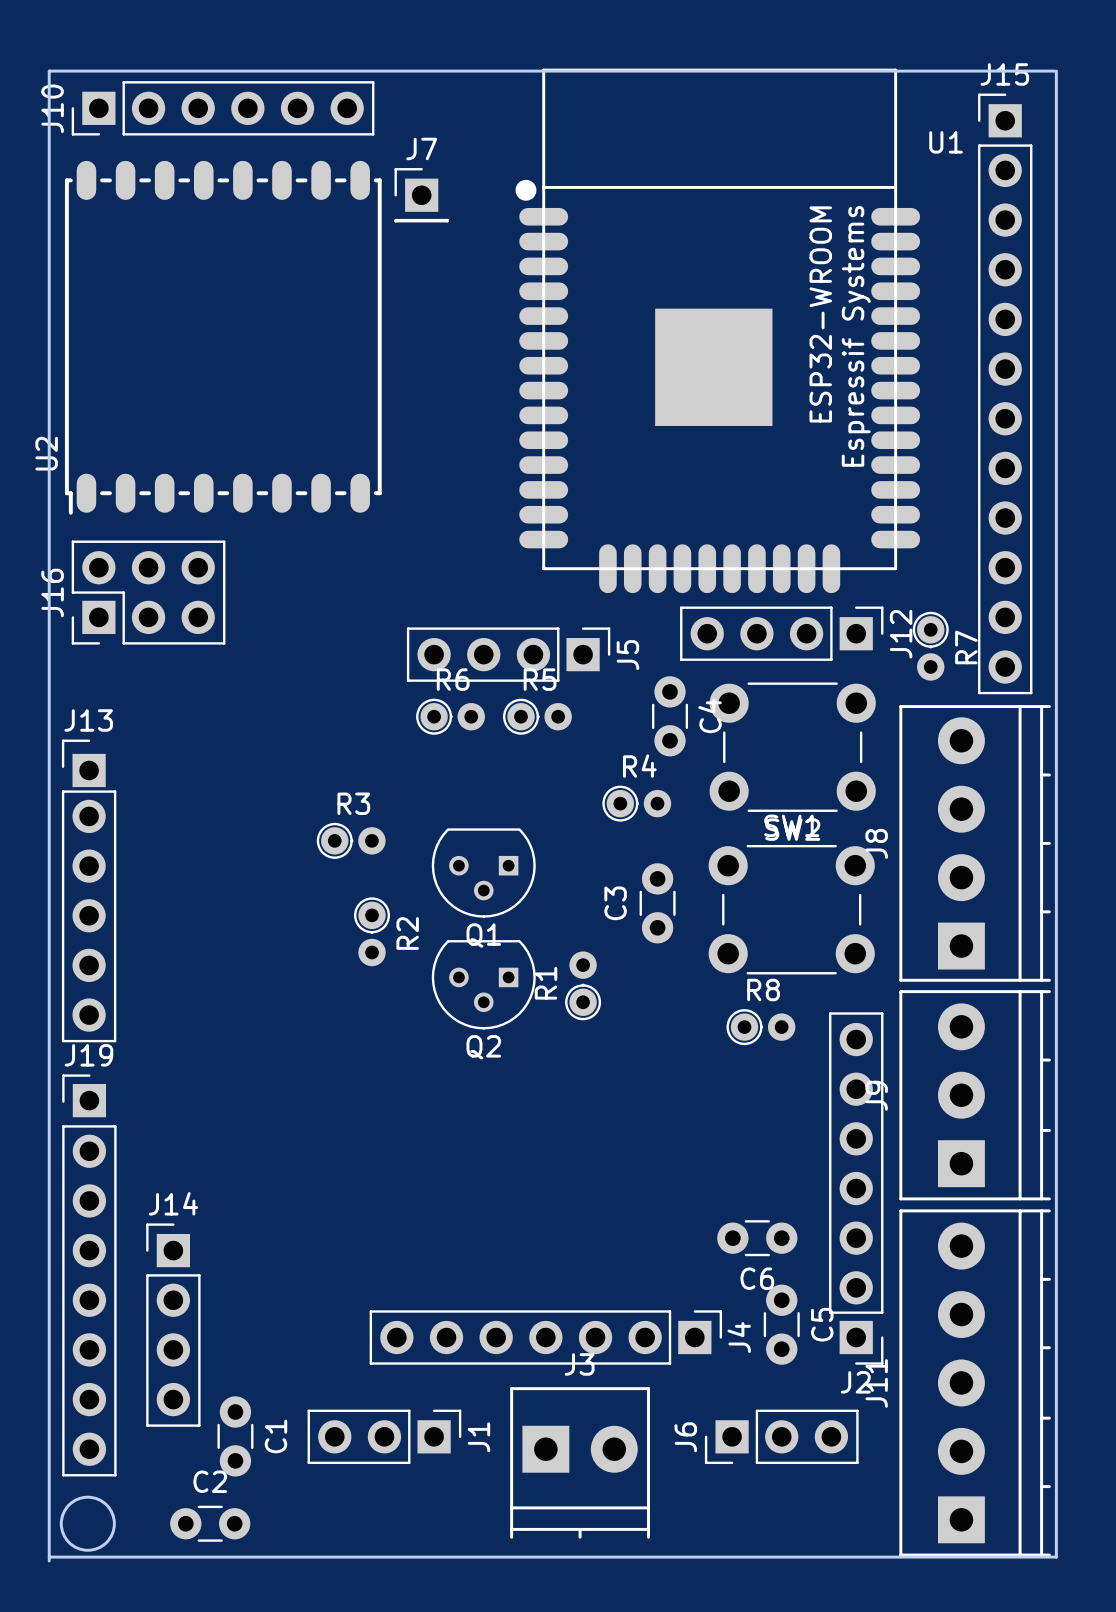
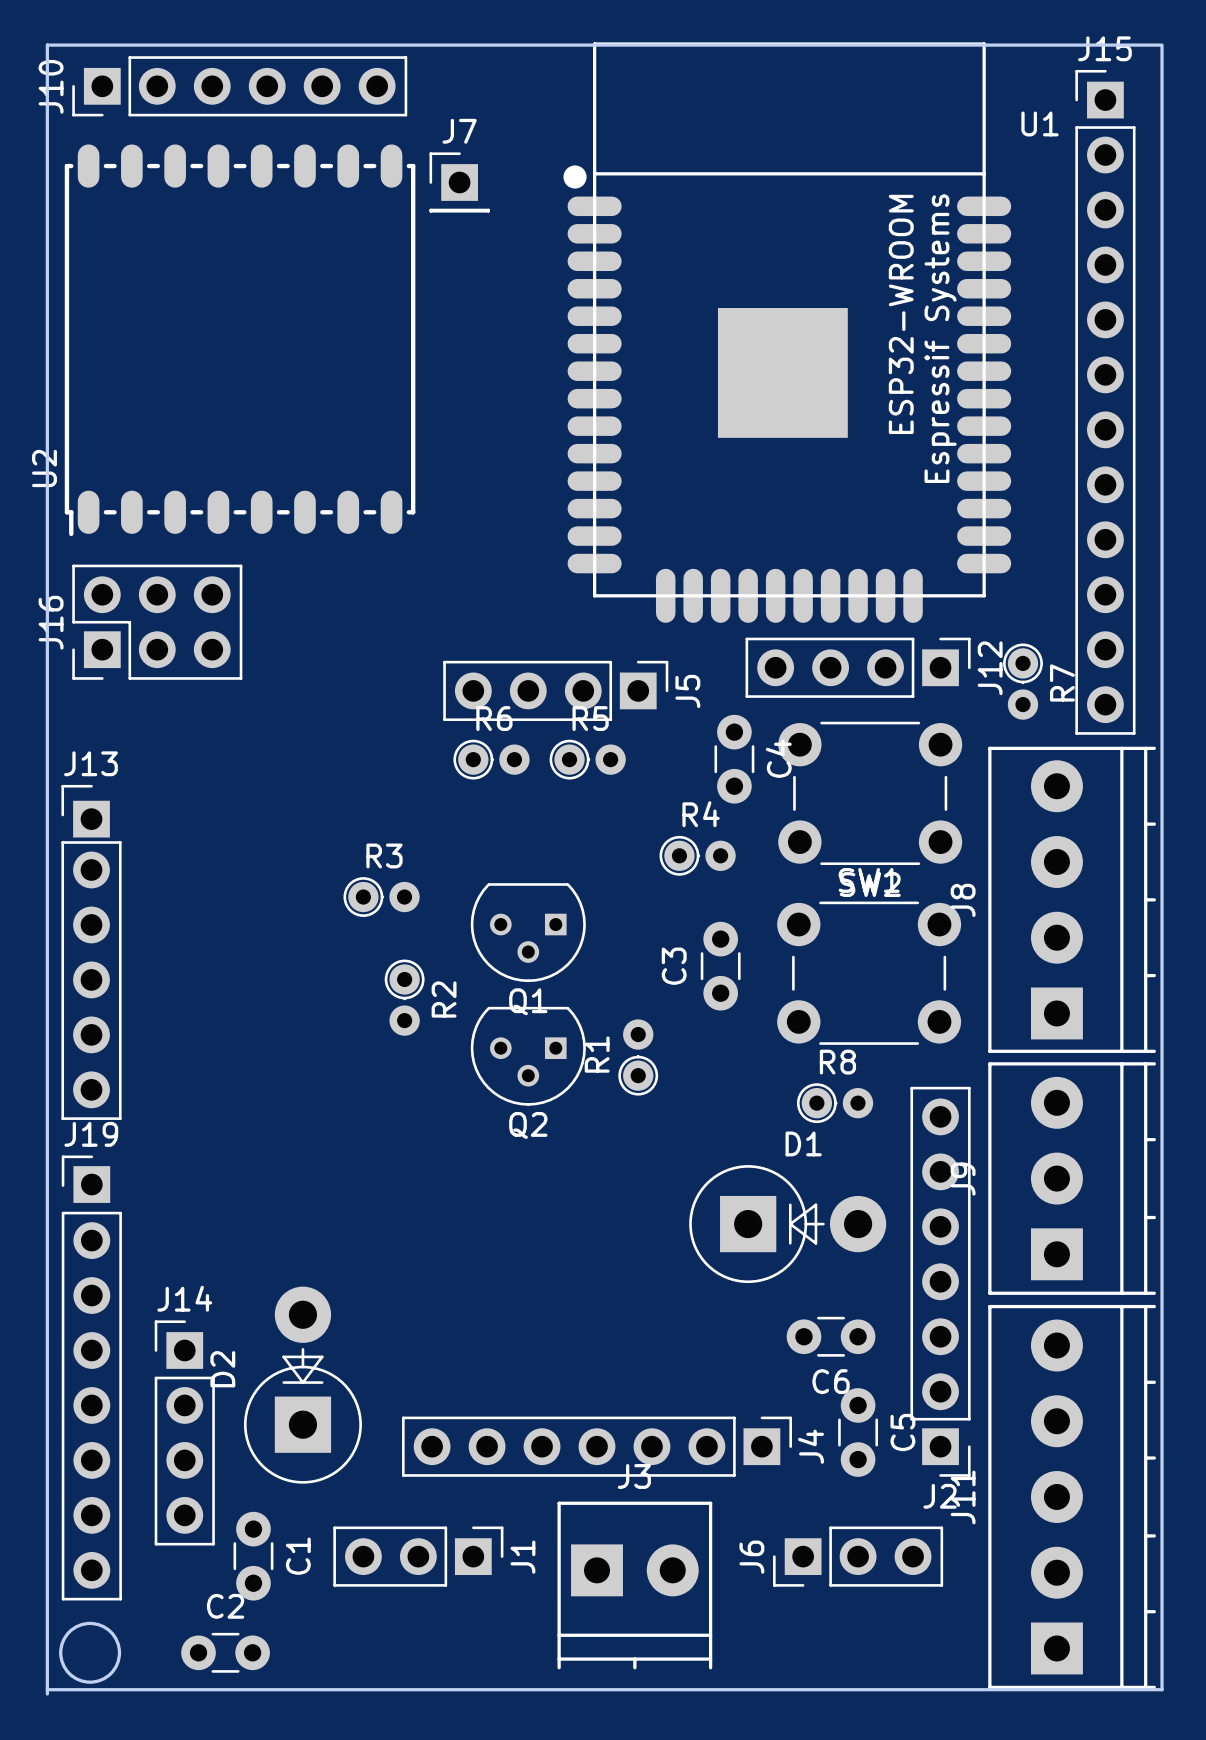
D1: none -> (787, 1224)
D2: none -> (302, 1385)

